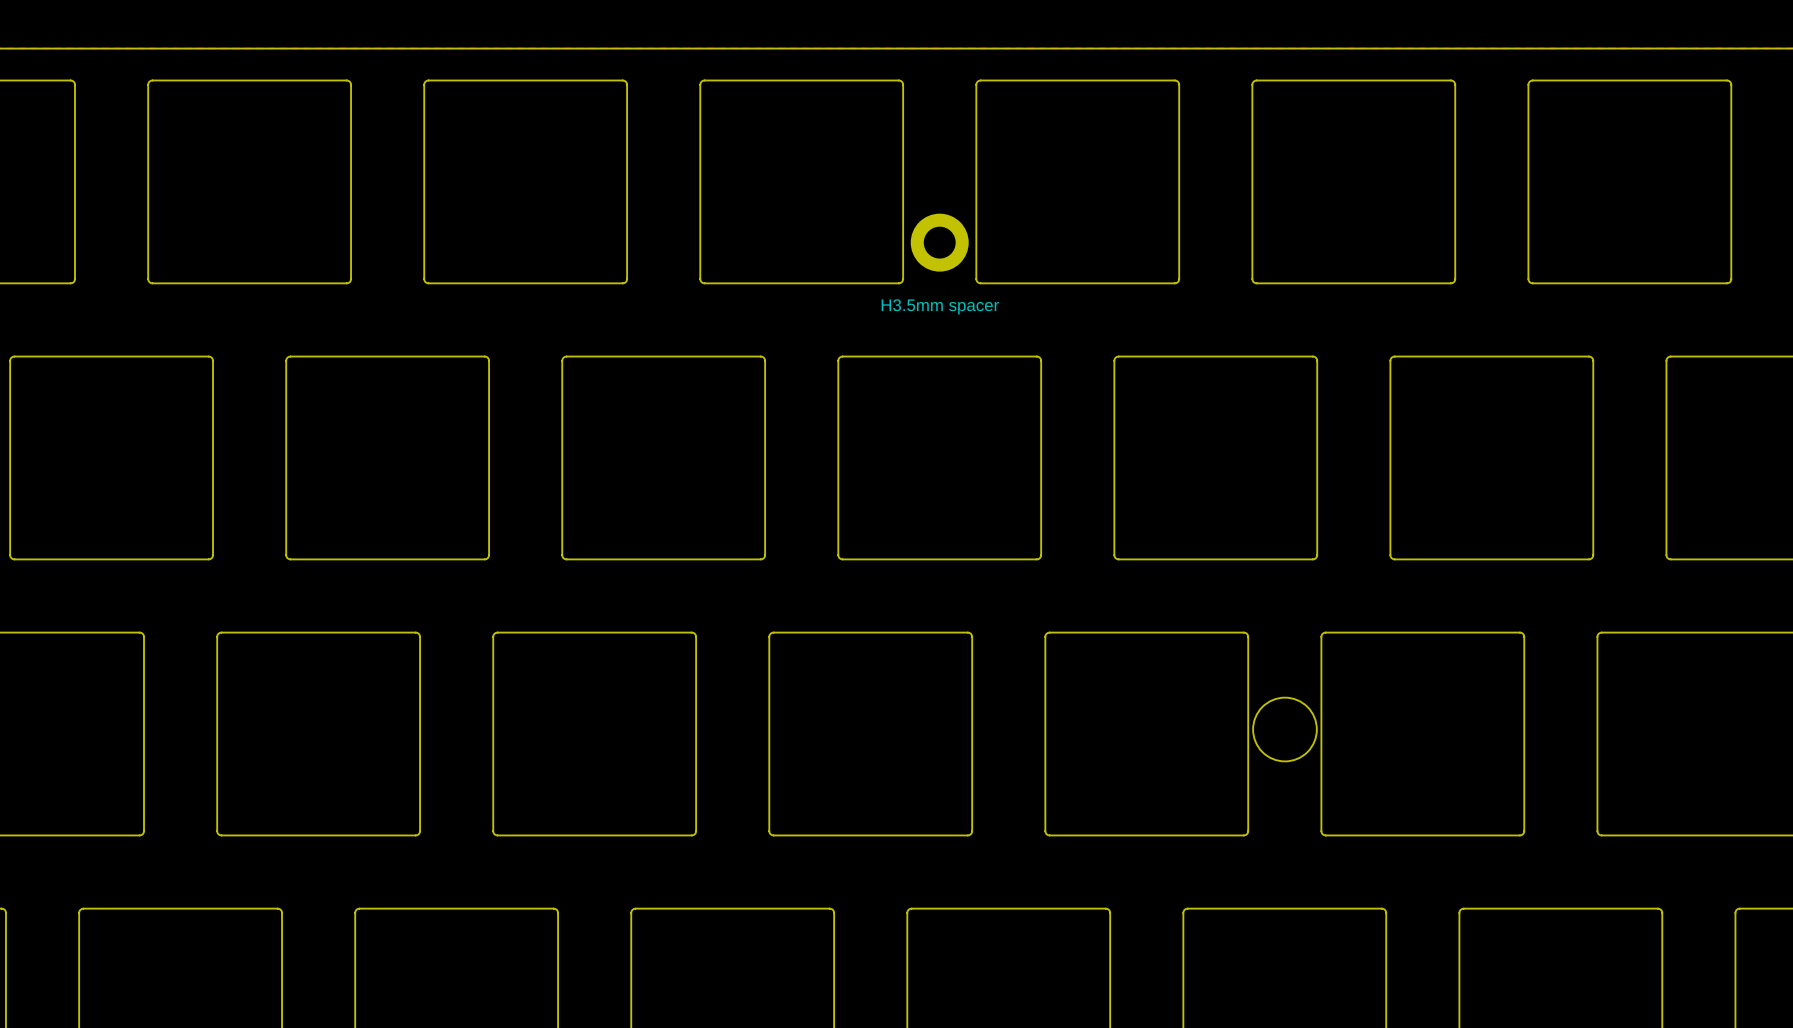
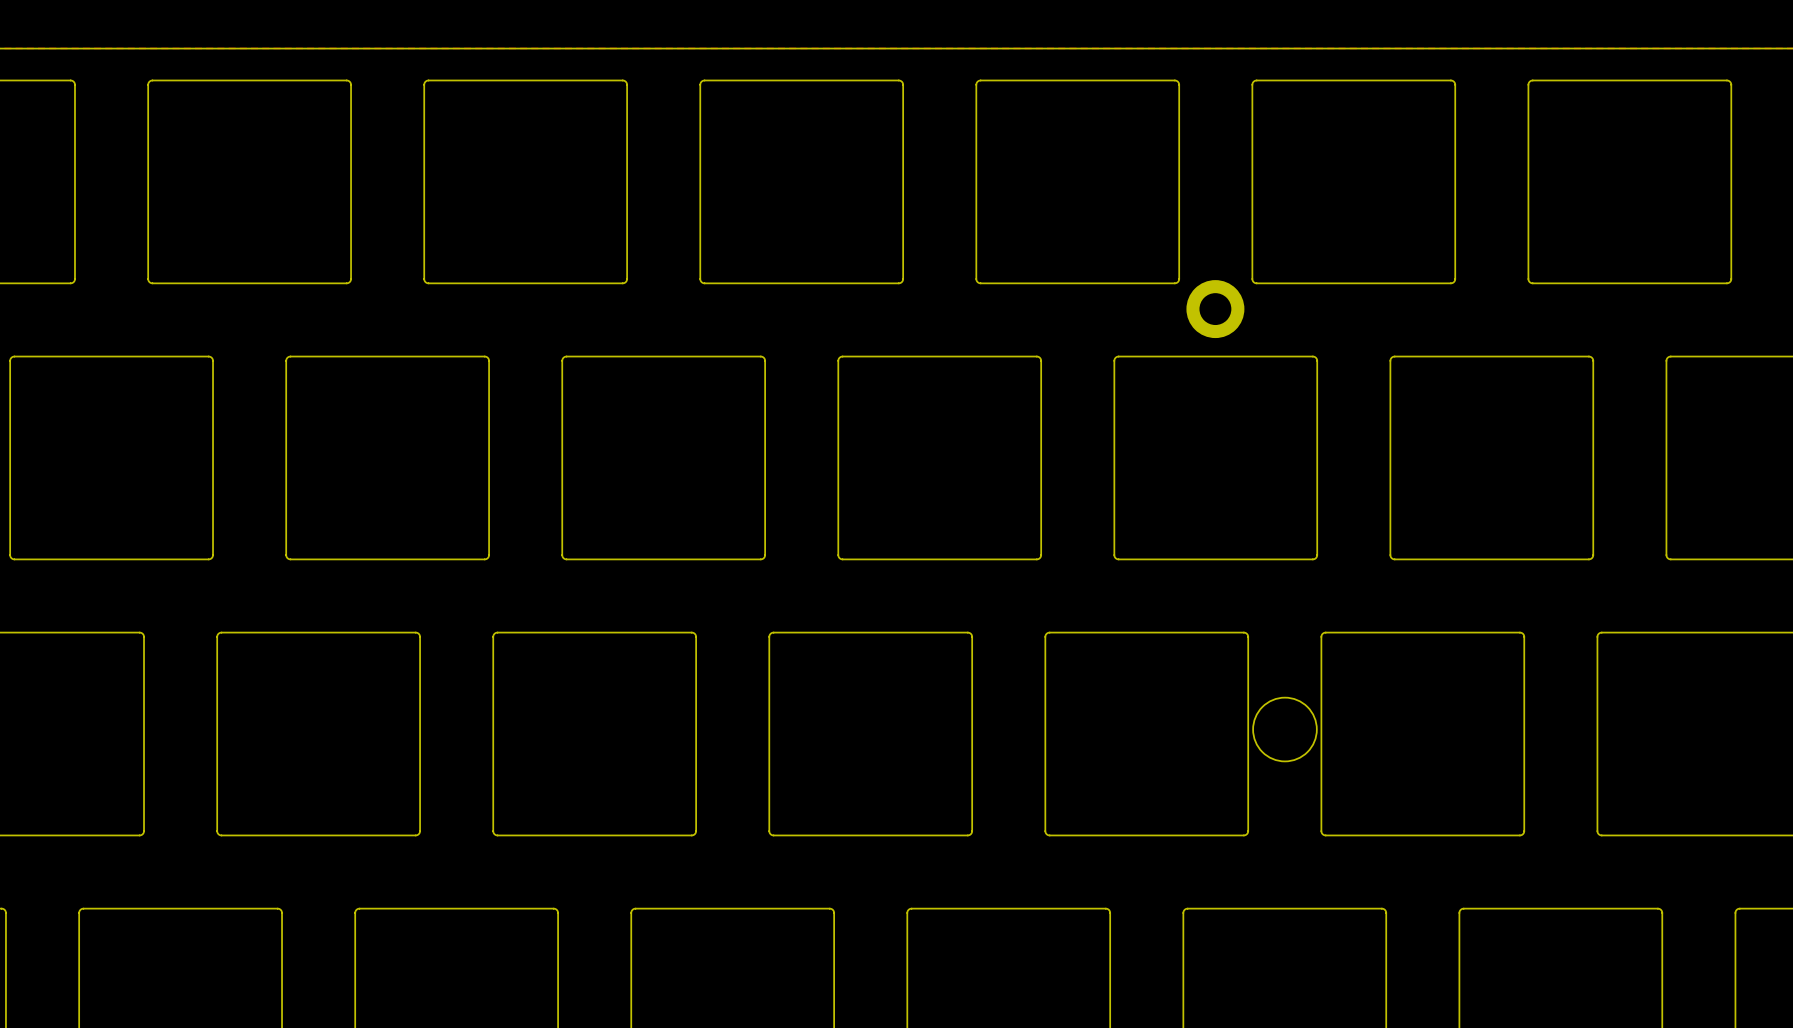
part: H3.5mm spacer (939, 242) -> none
part: none -> (1215, 309)

